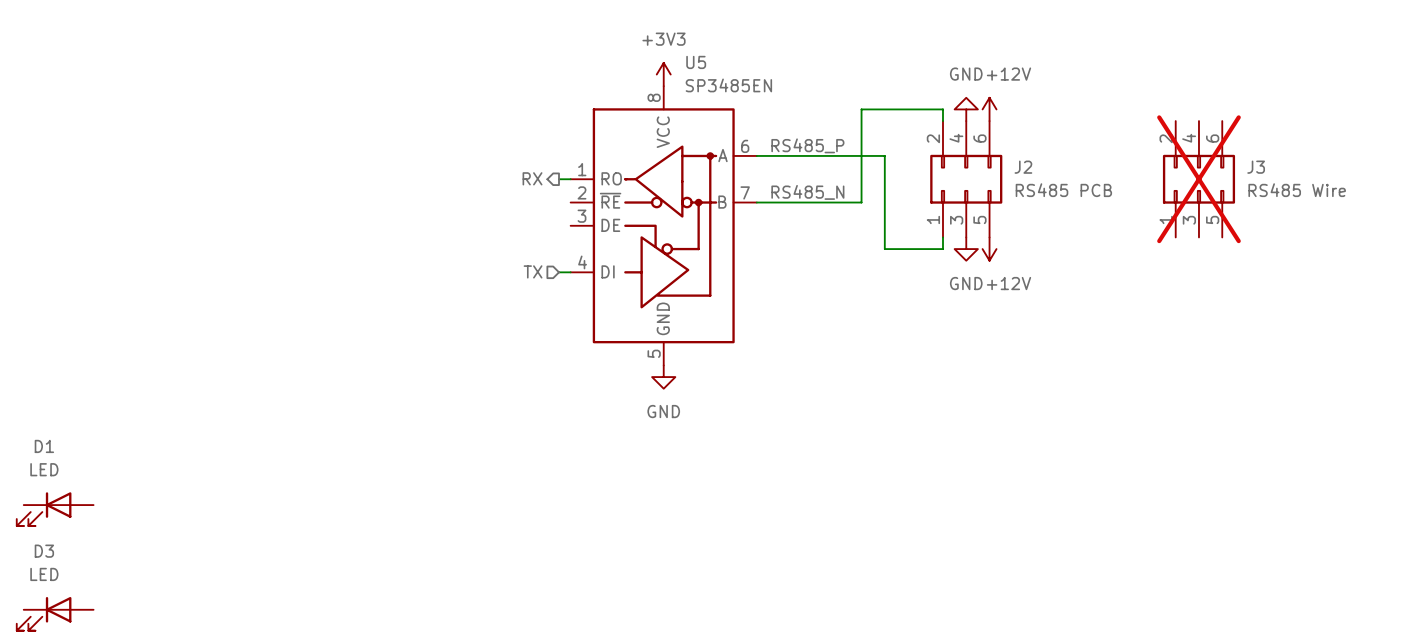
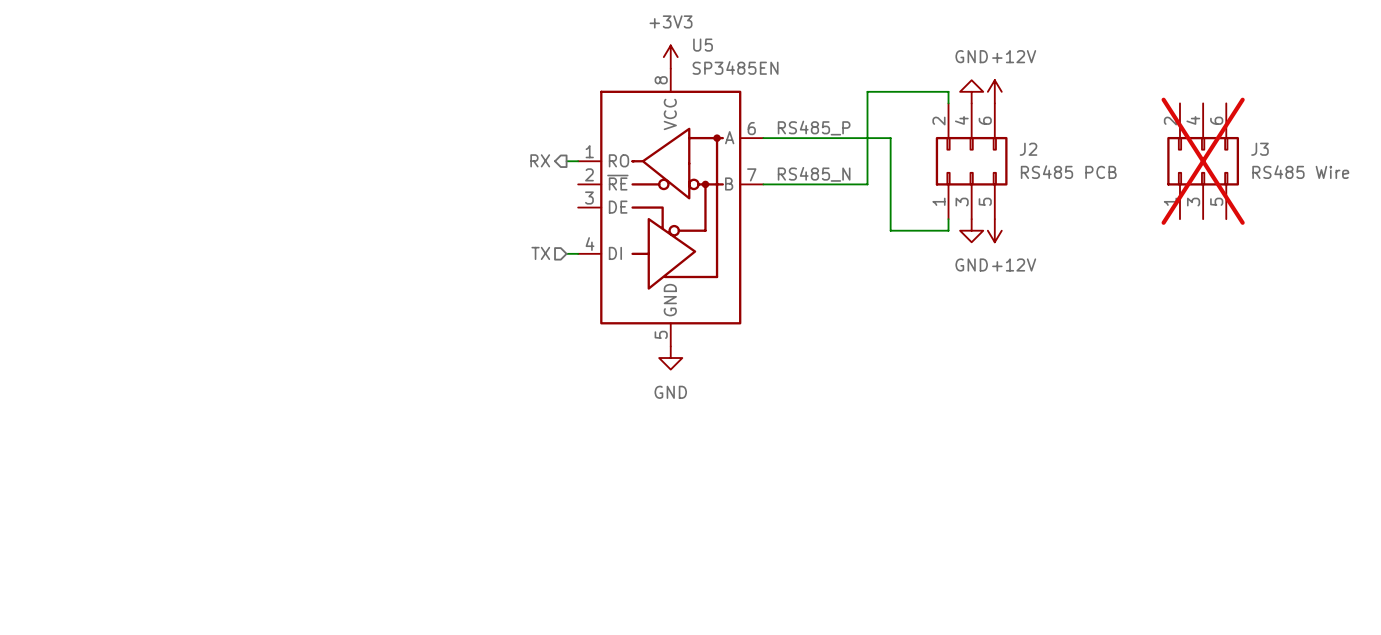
D1: LED (55, 509) -> none
D3: LED (55, 613) -> none

